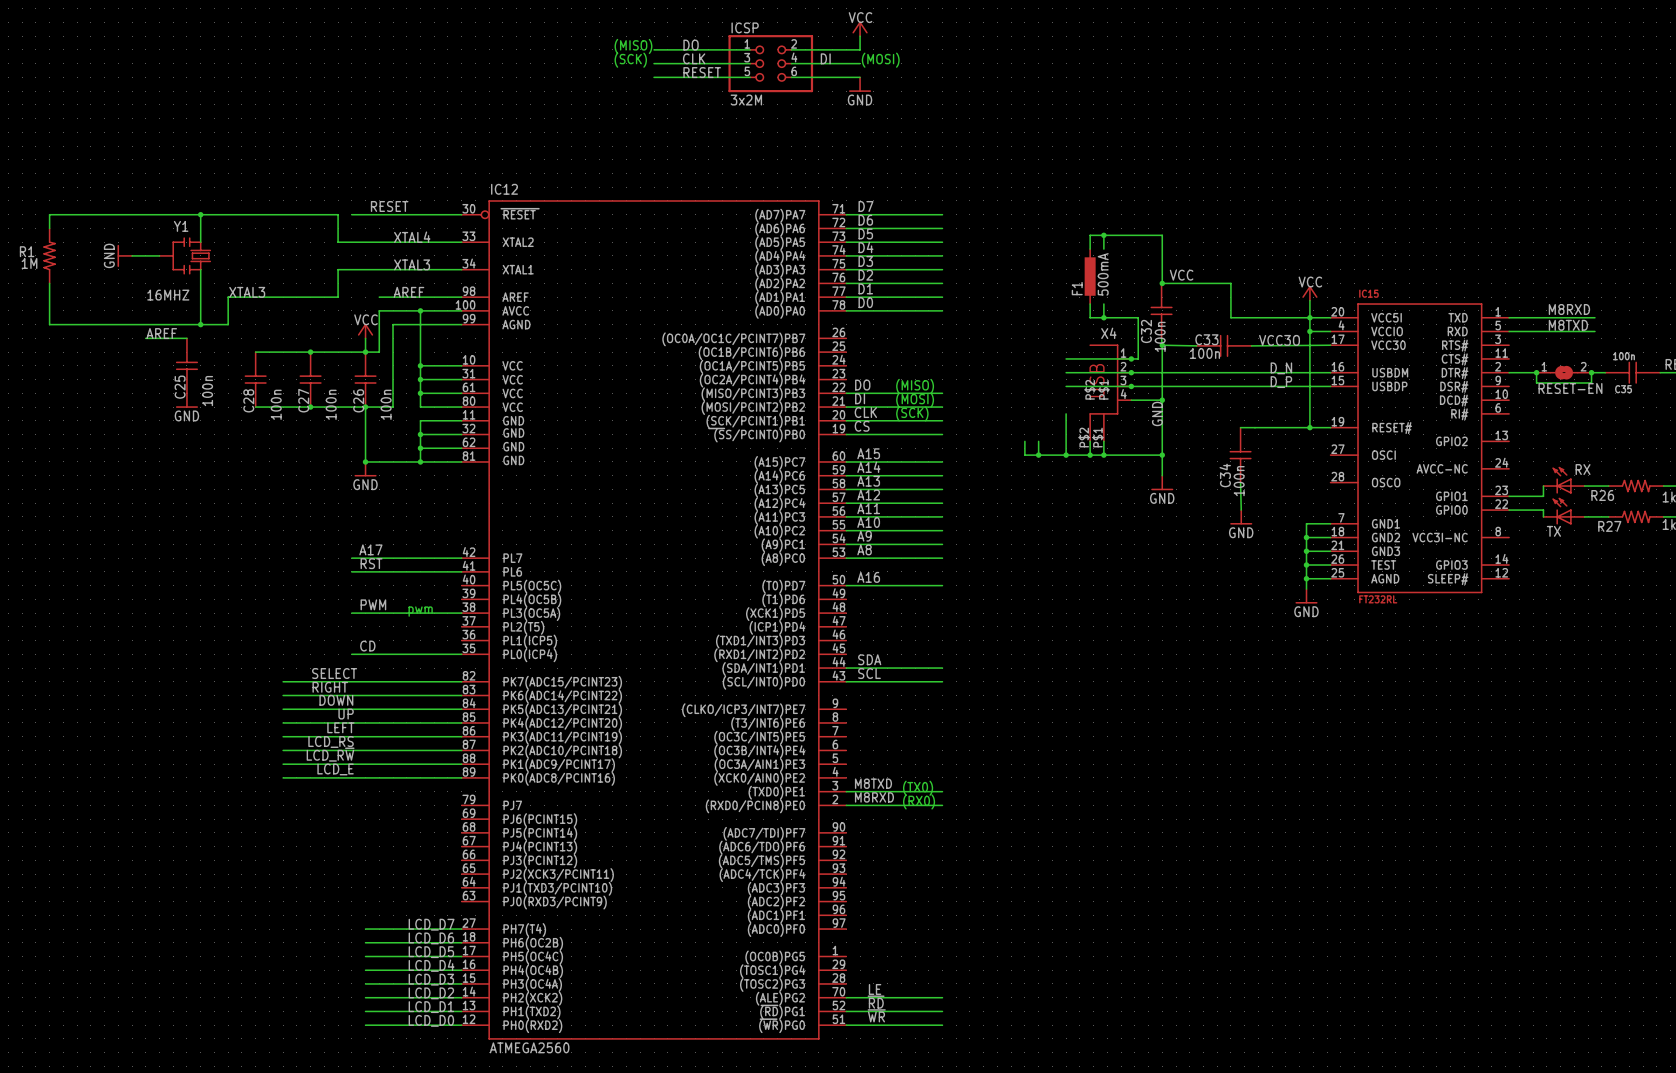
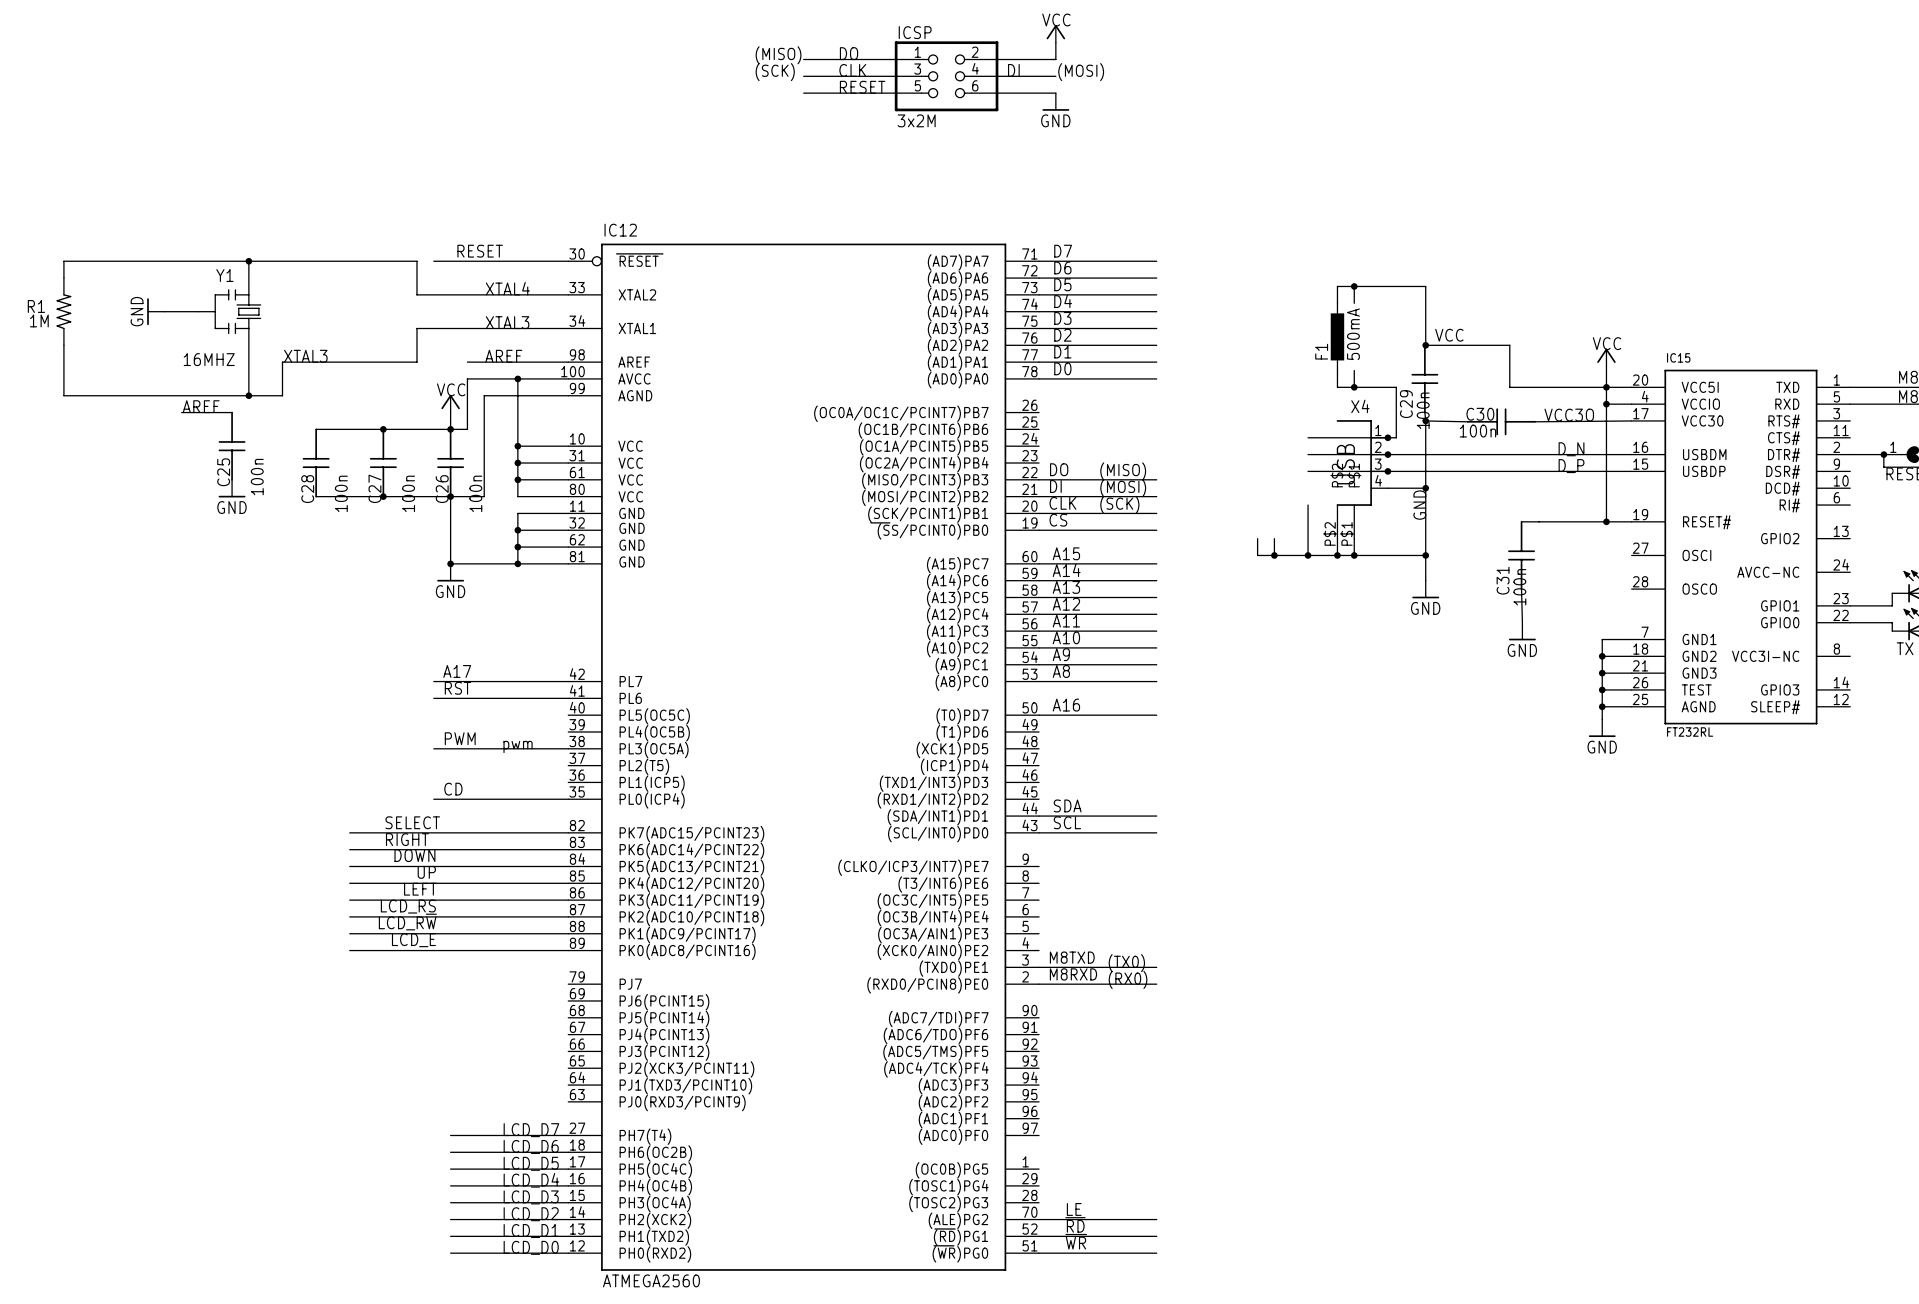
C32 name: C32 (1146, 331) -> C29 (1406, 404)
C33 name: C33 (1206, 339) -> C30 (1480, 414)
C34 name: C34 (1225, 475) -> C31 (1503, 580)

